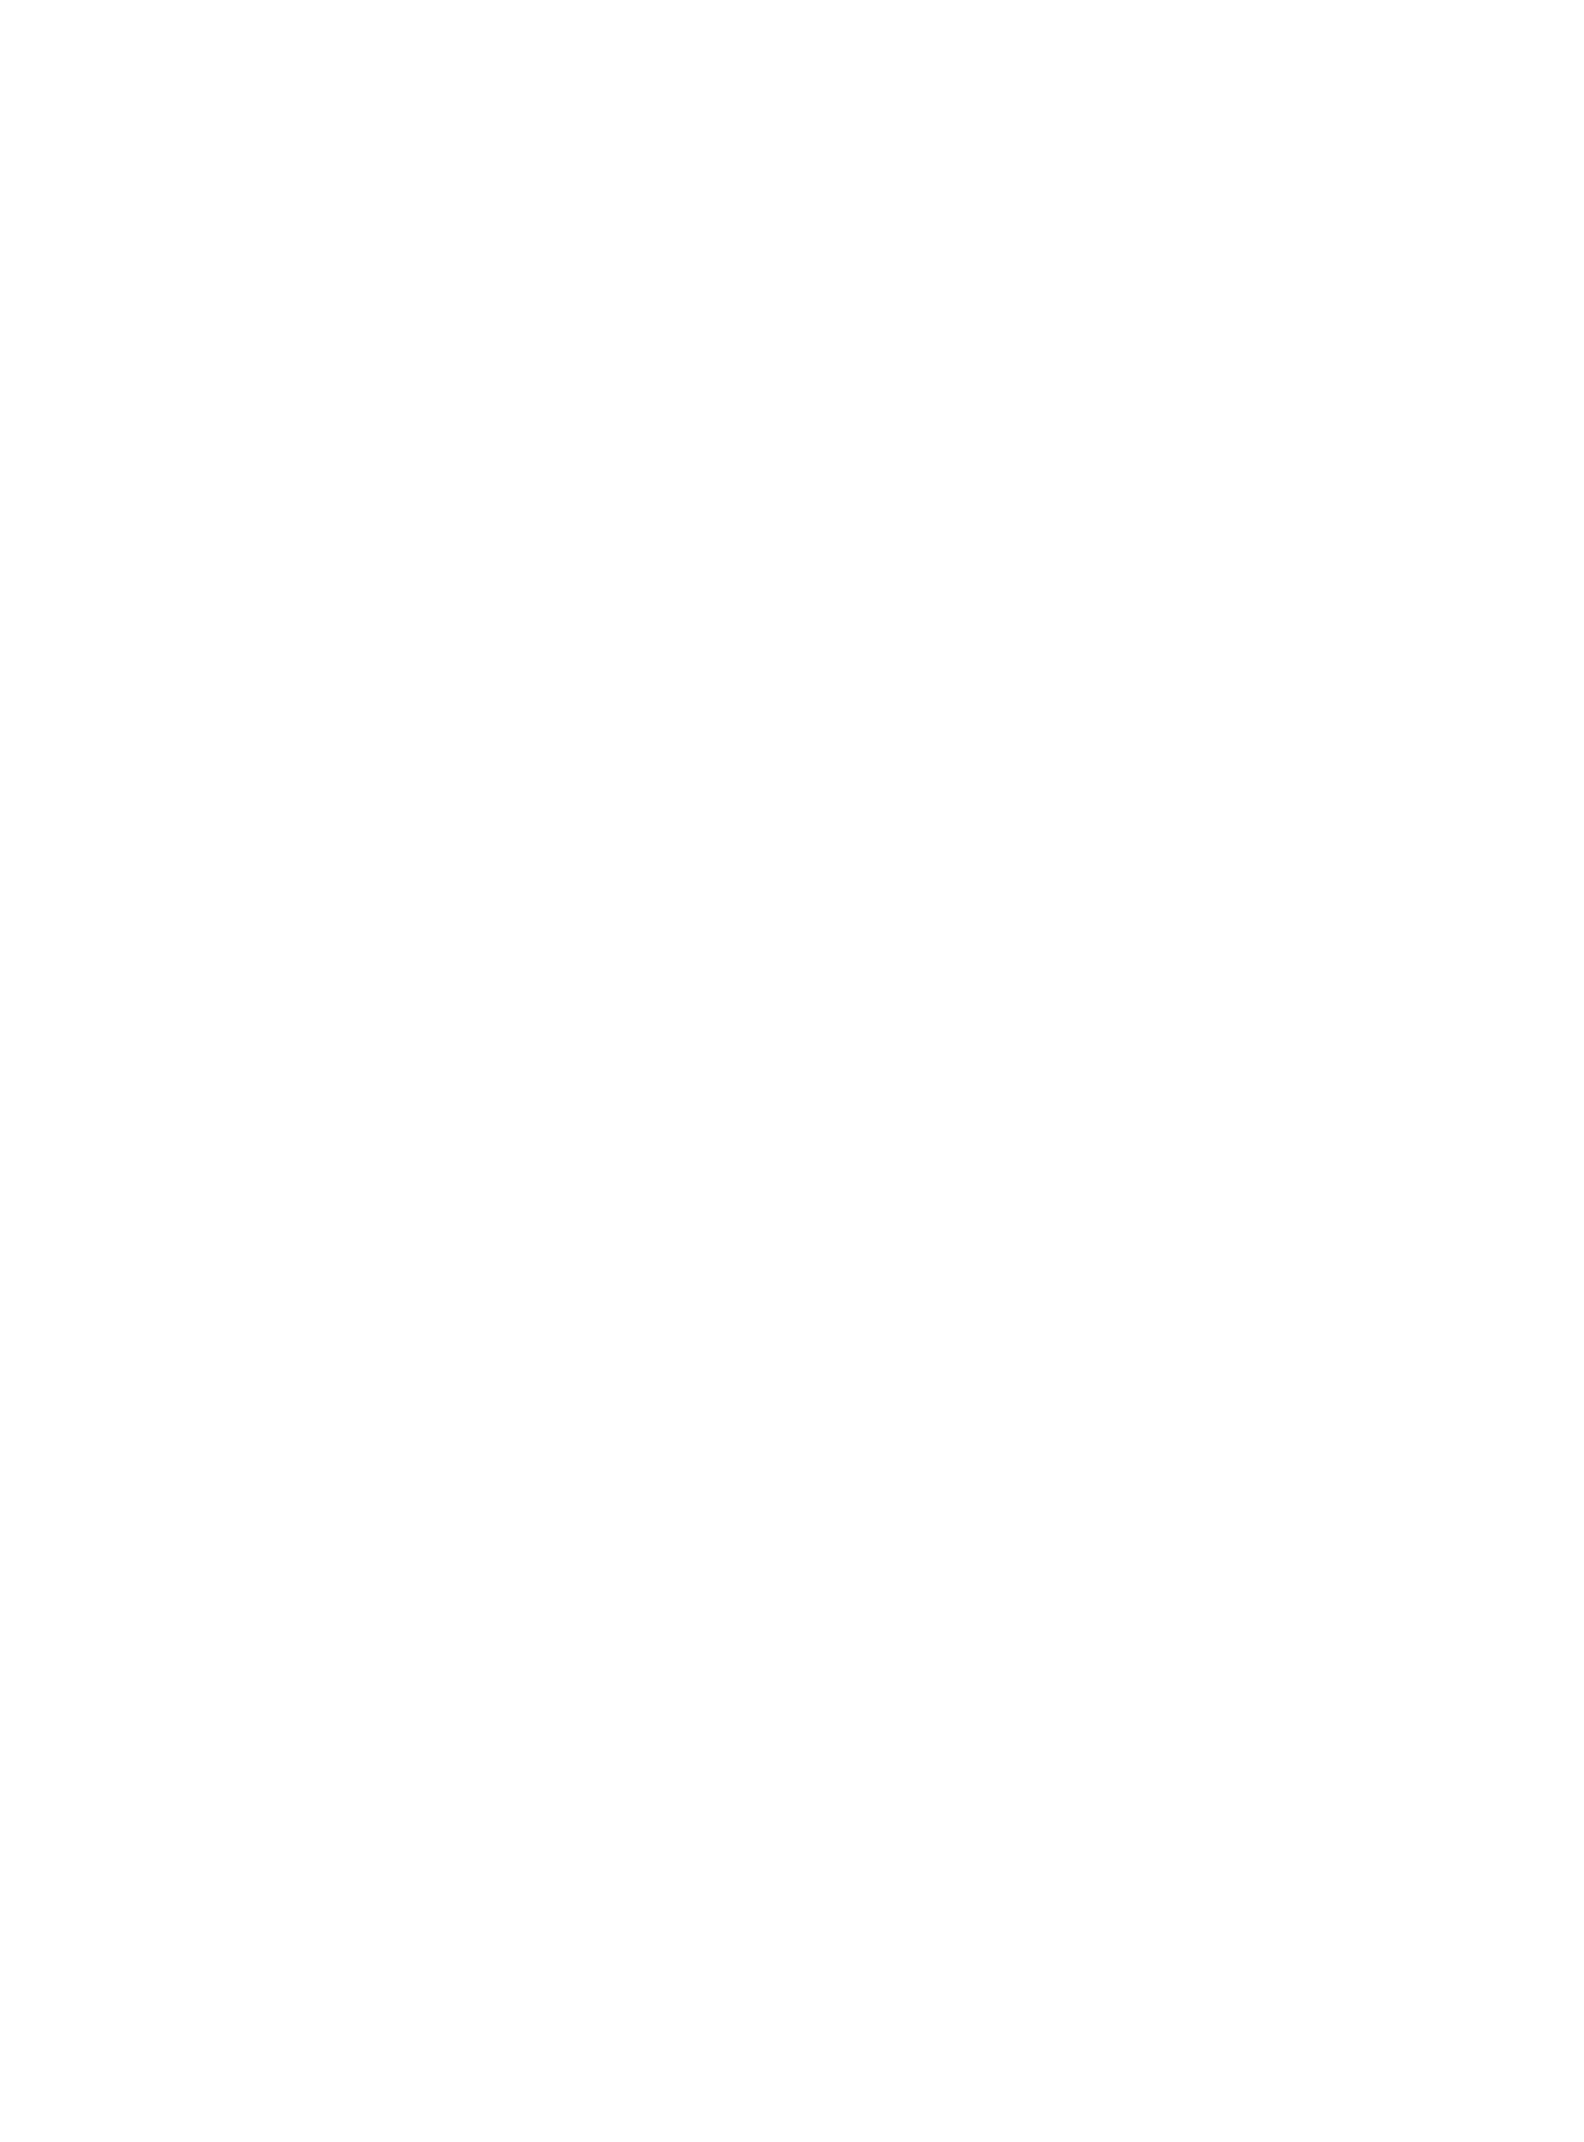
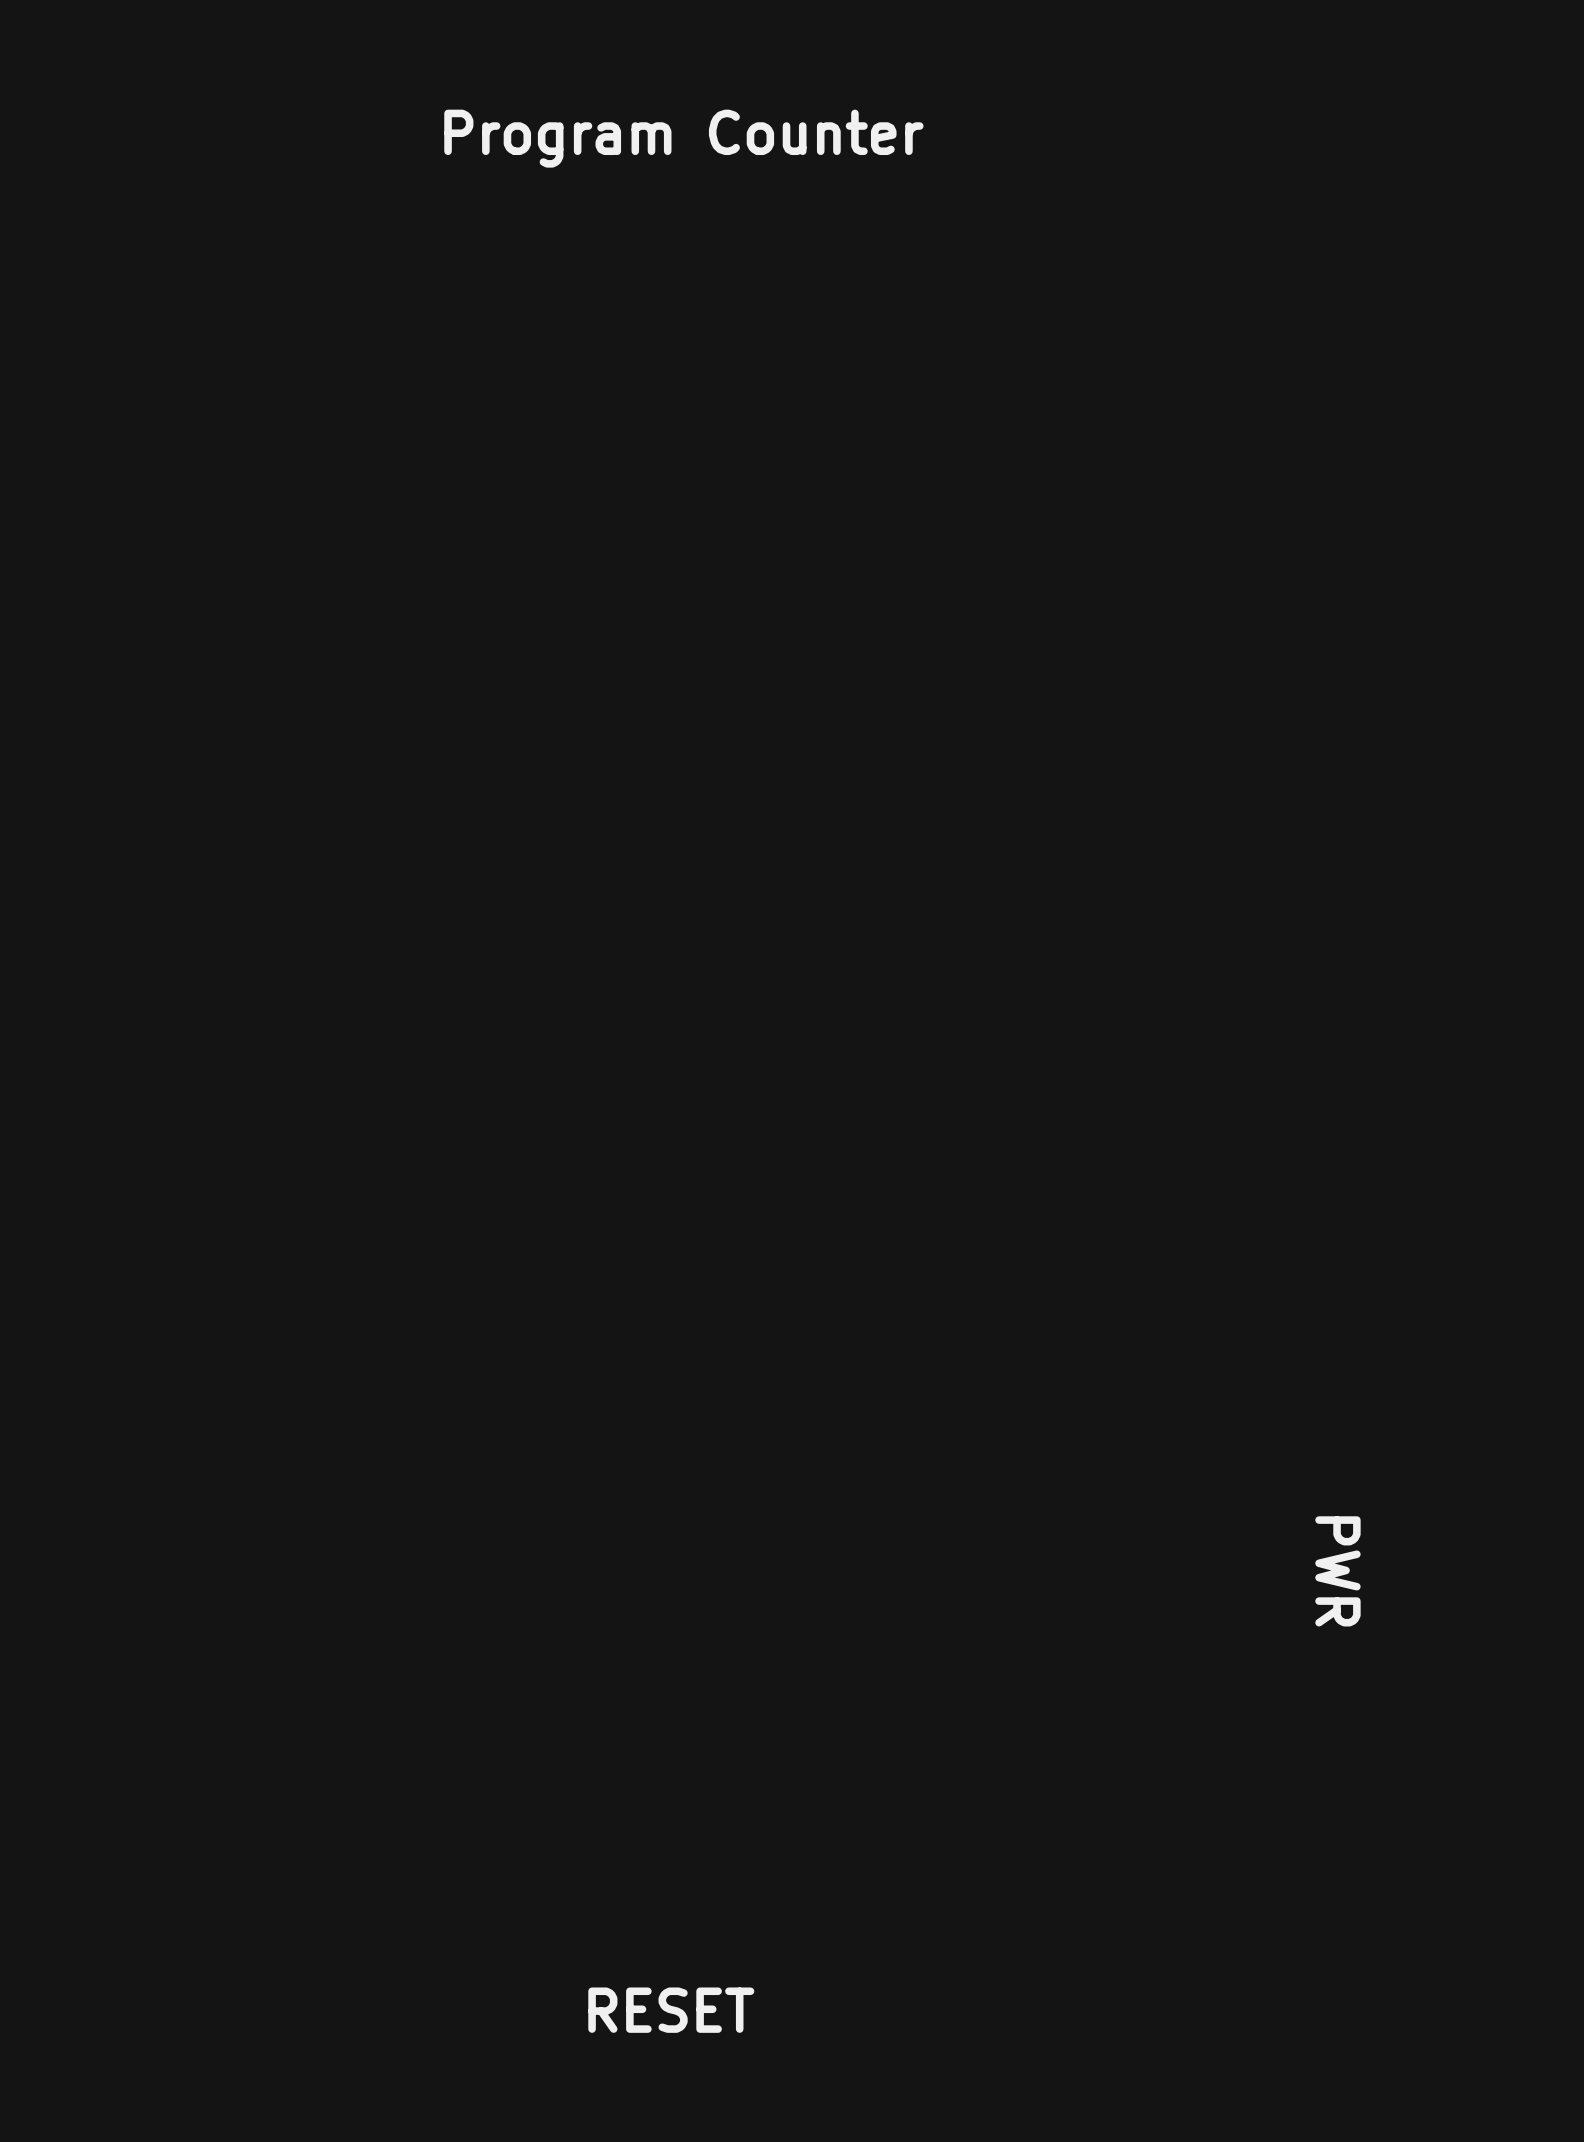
text: none -> Program Counter (683, 138)
text: none -> PWR (1337, 1571)
text: none -> RESET (671, 2010)

